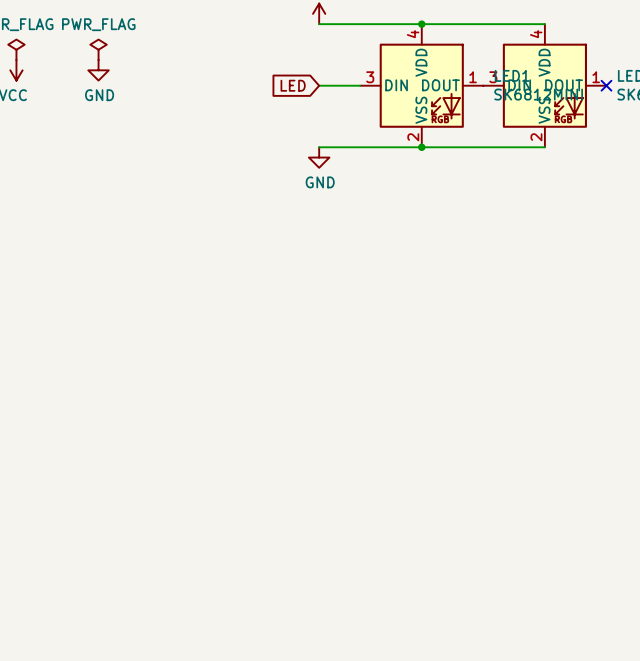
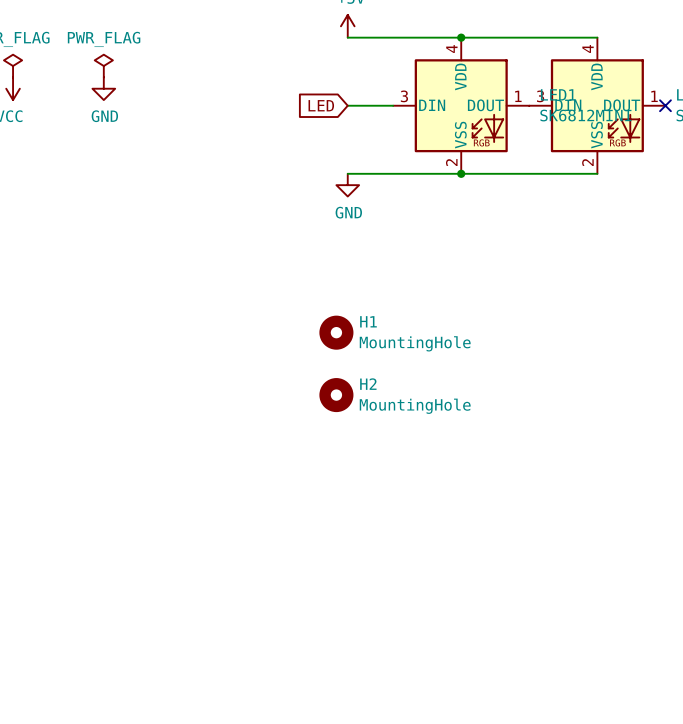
H1: none -> MountingHole (336, 332)
H2: none -> MountingHole (336, 395)

